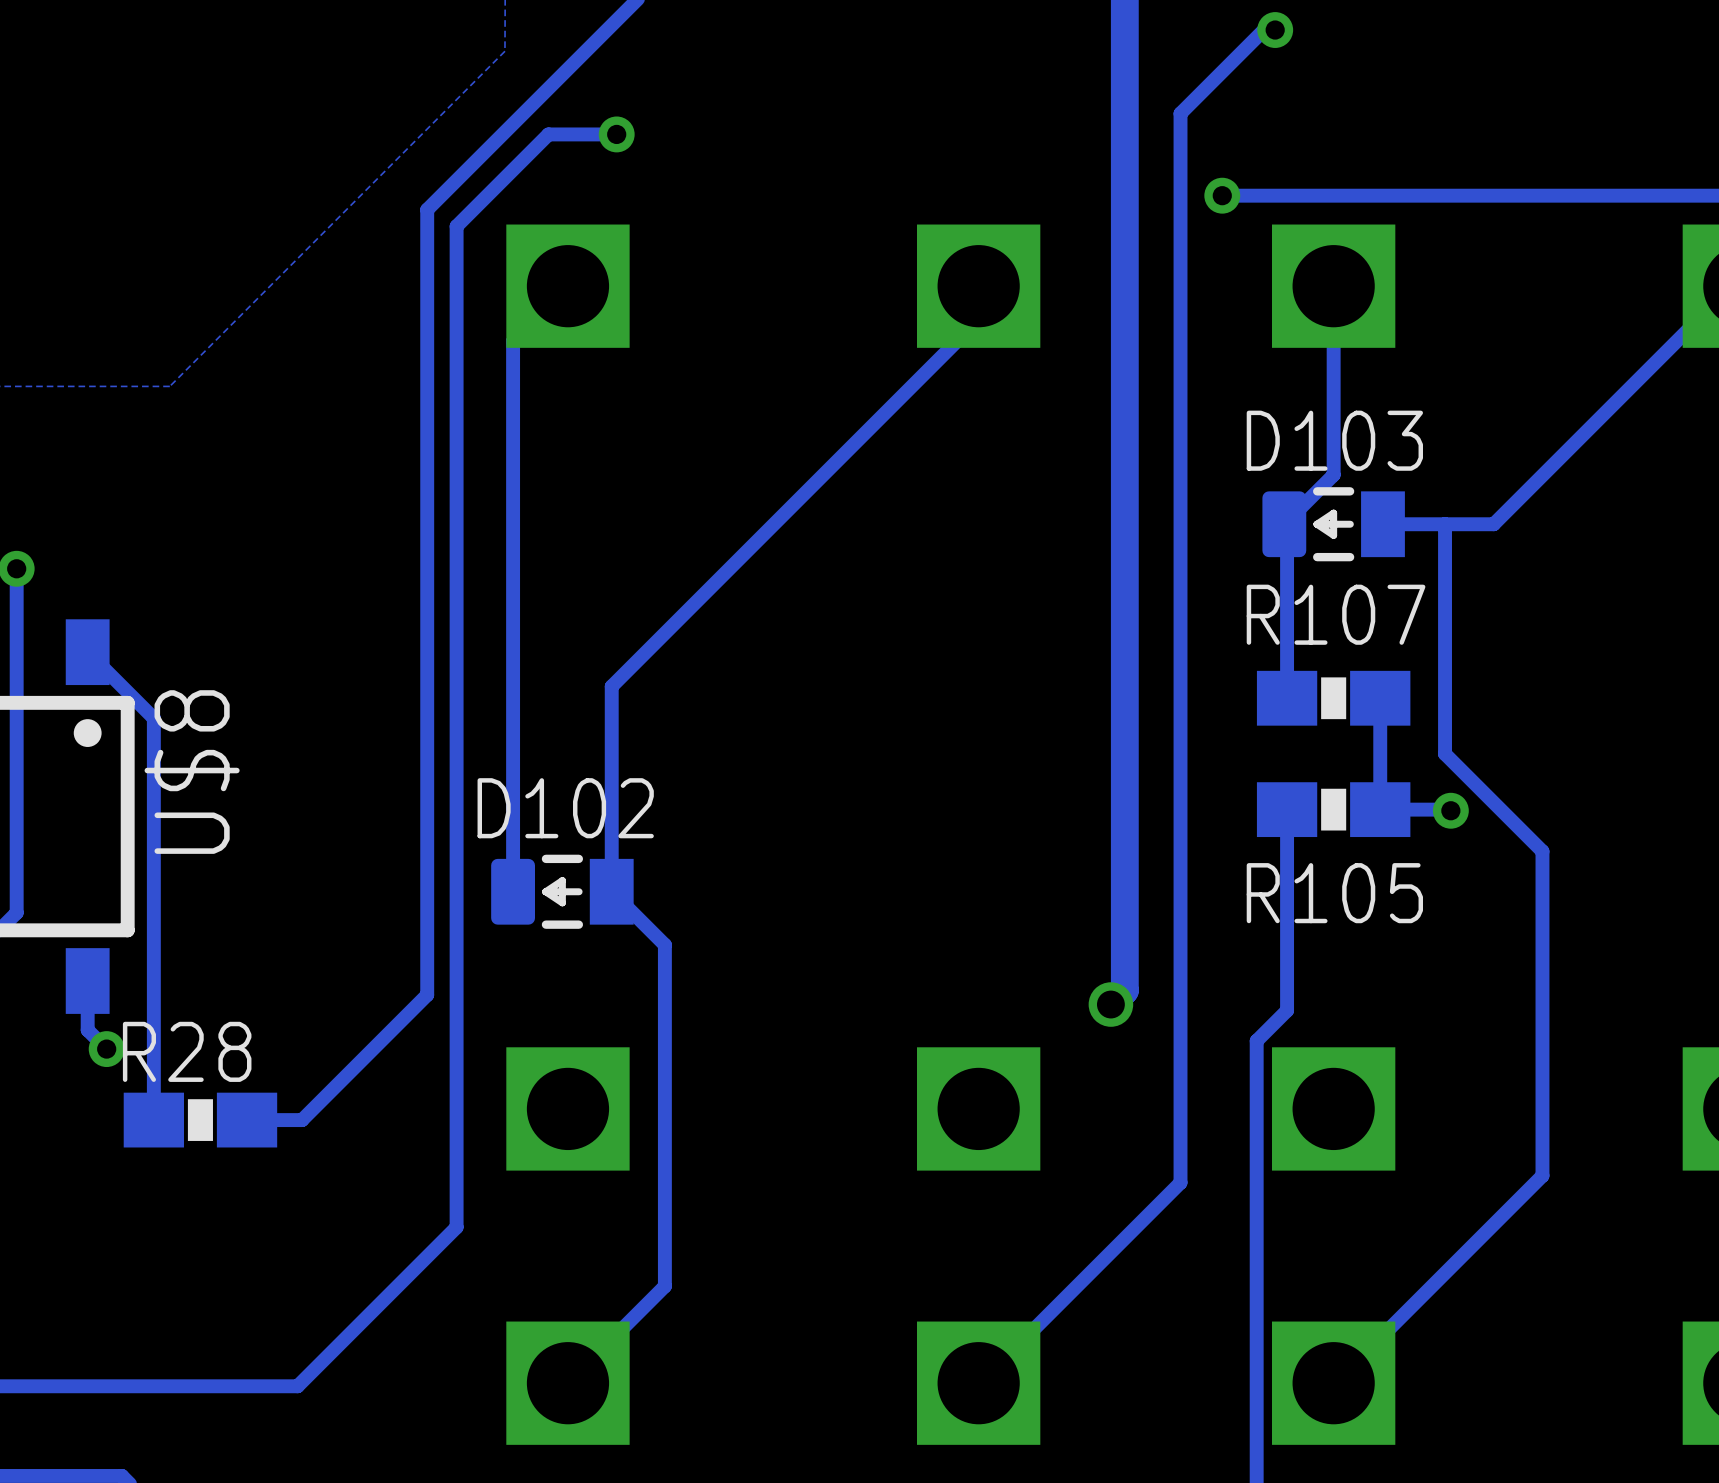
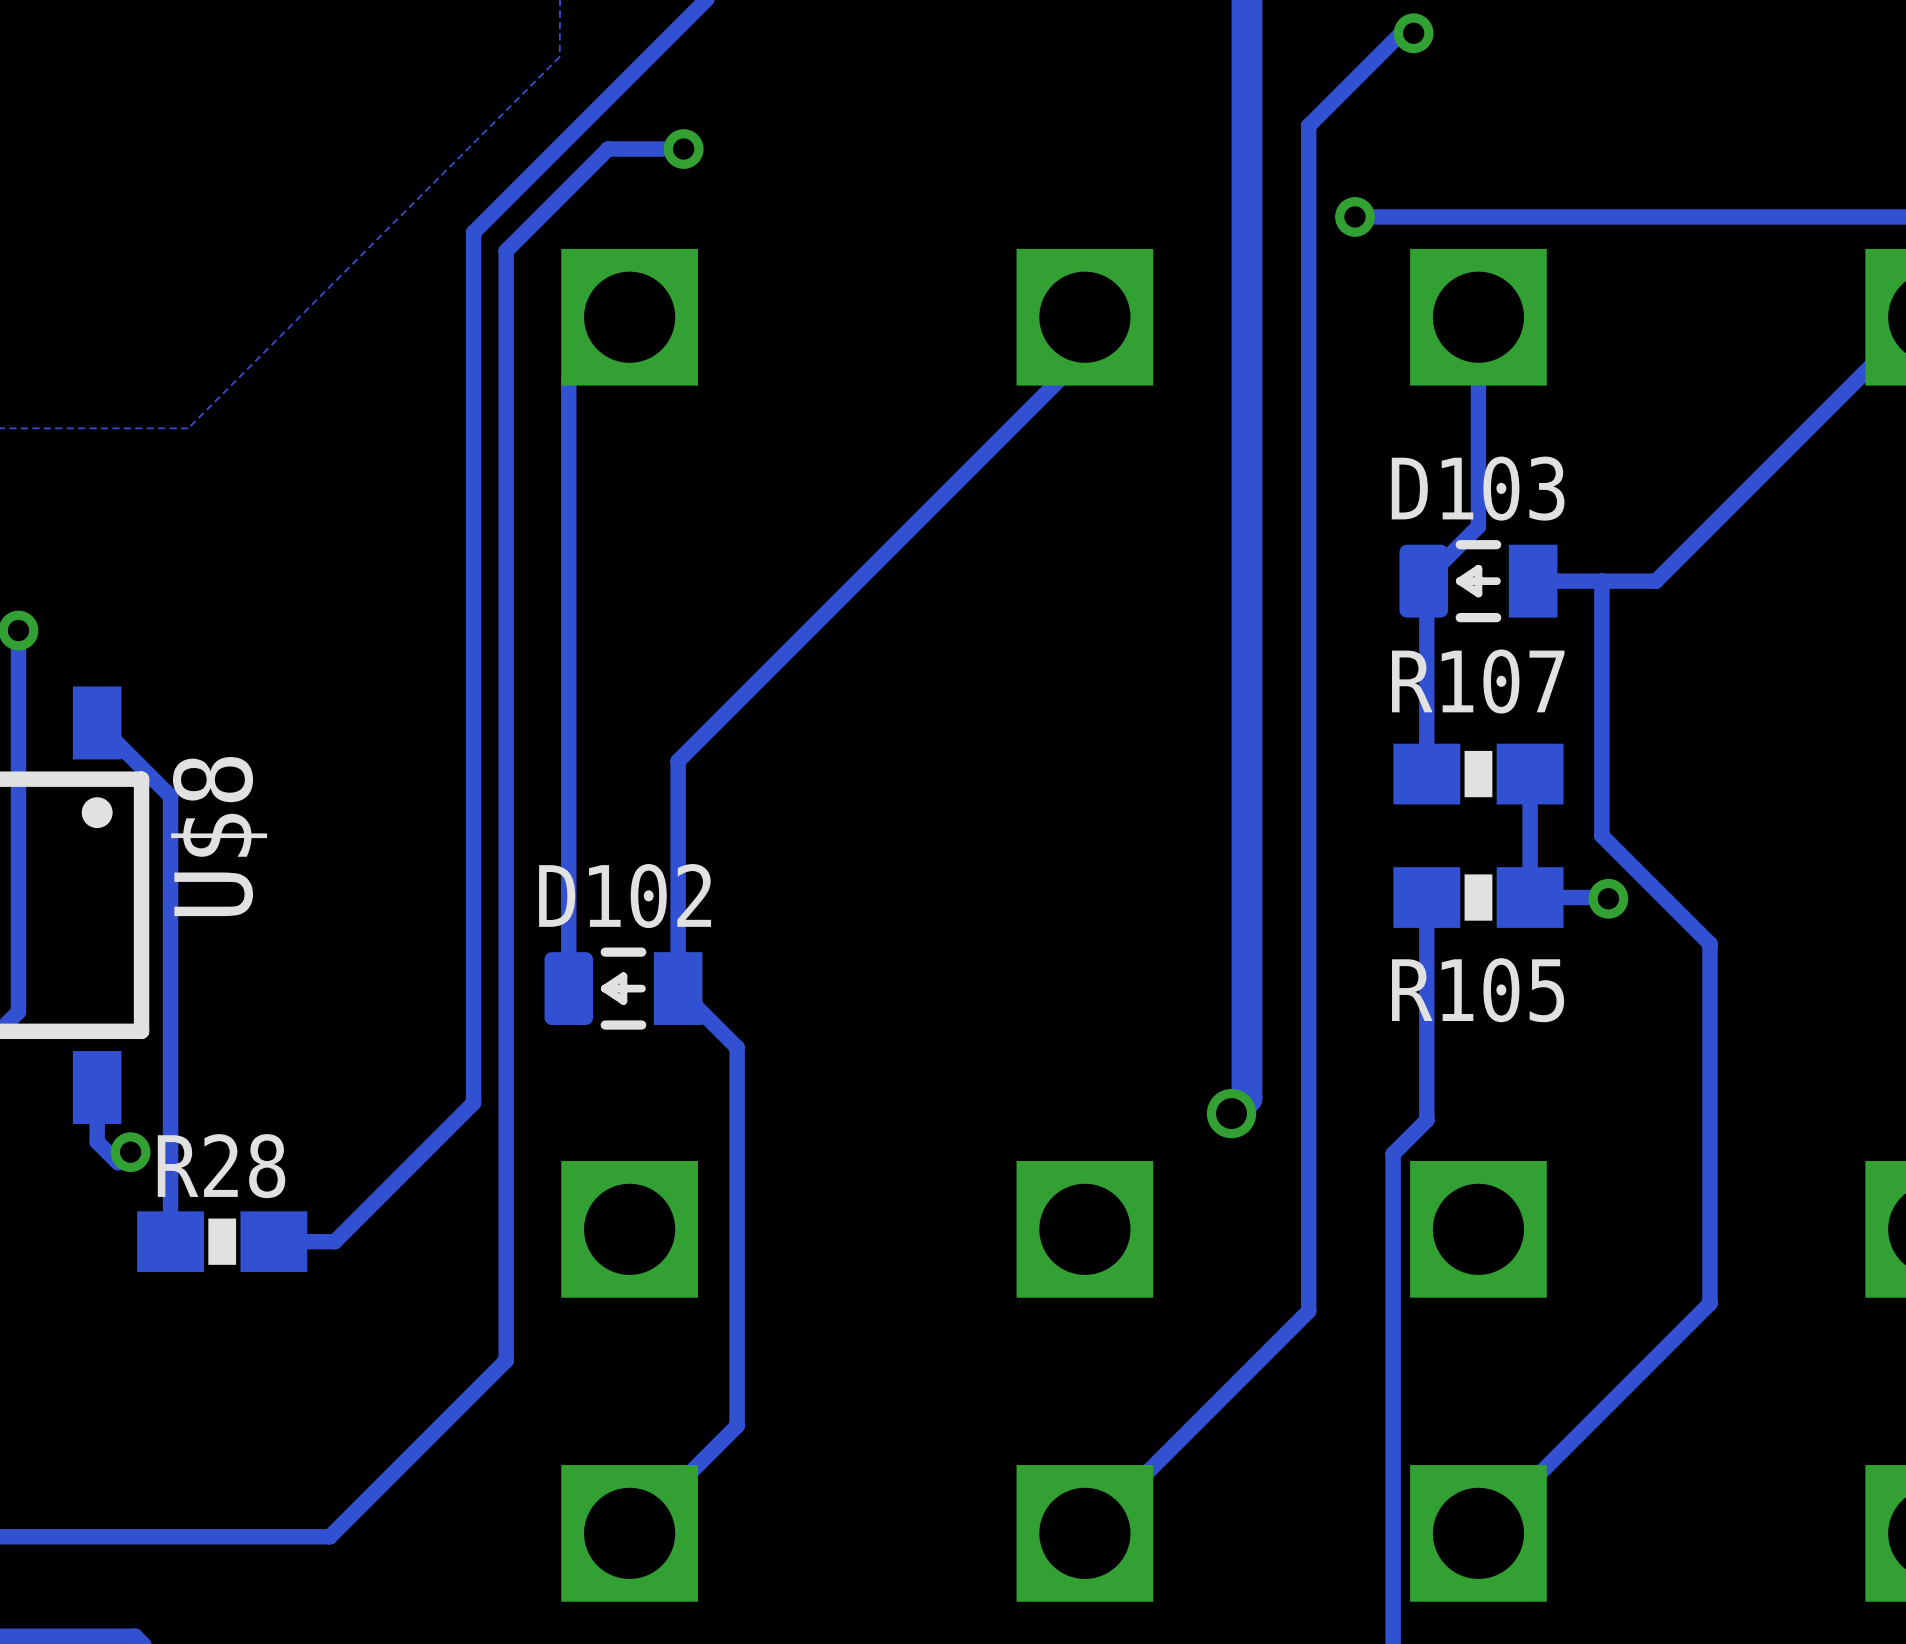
via position: (106, 1049) -> (130, 1152)

